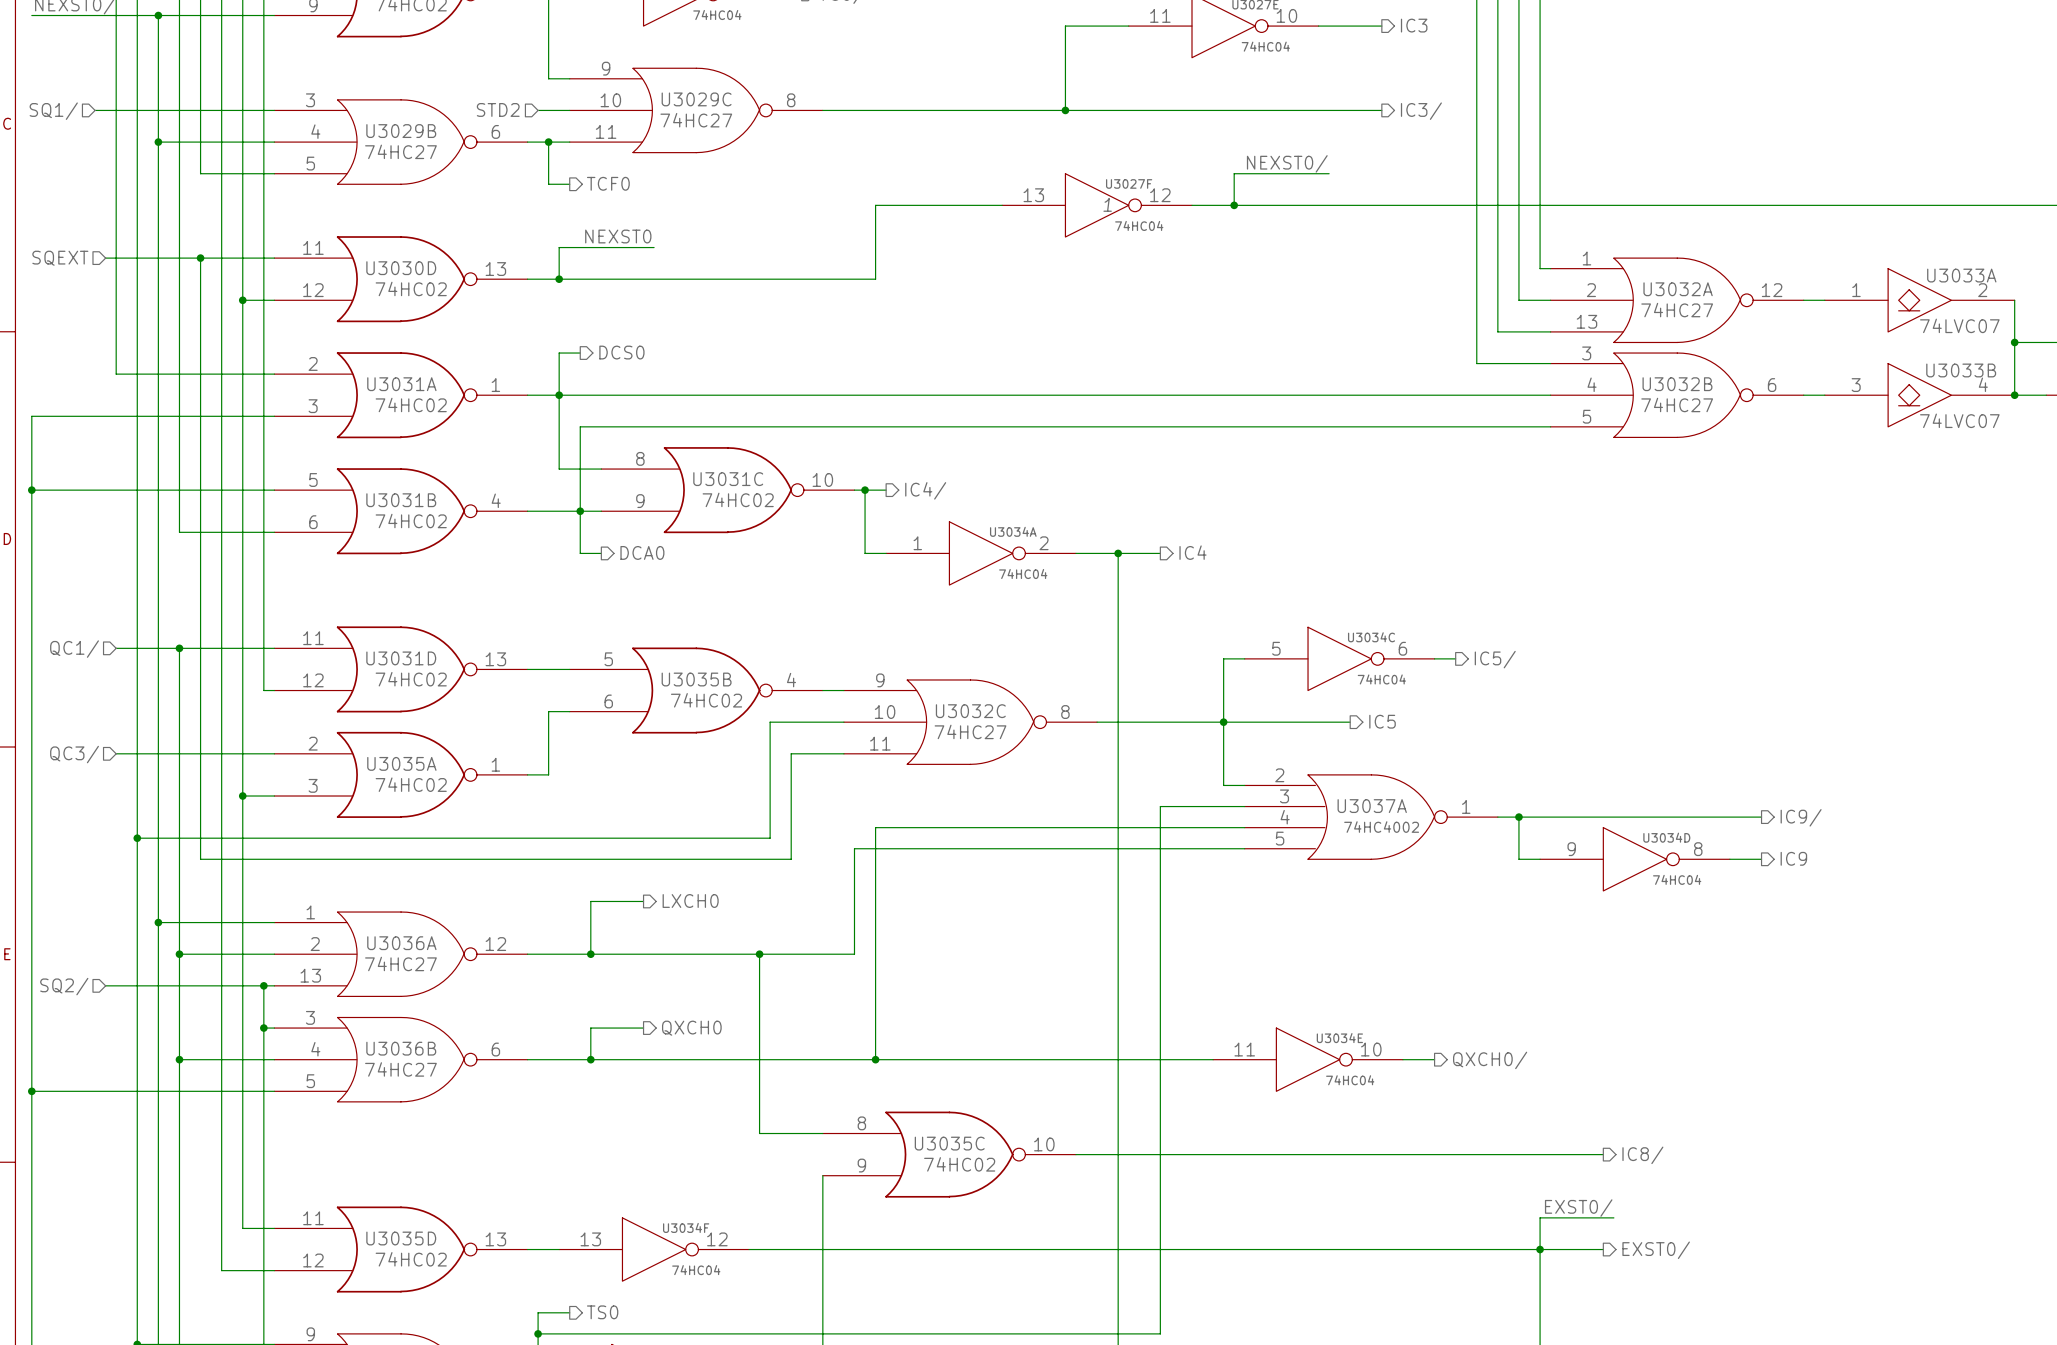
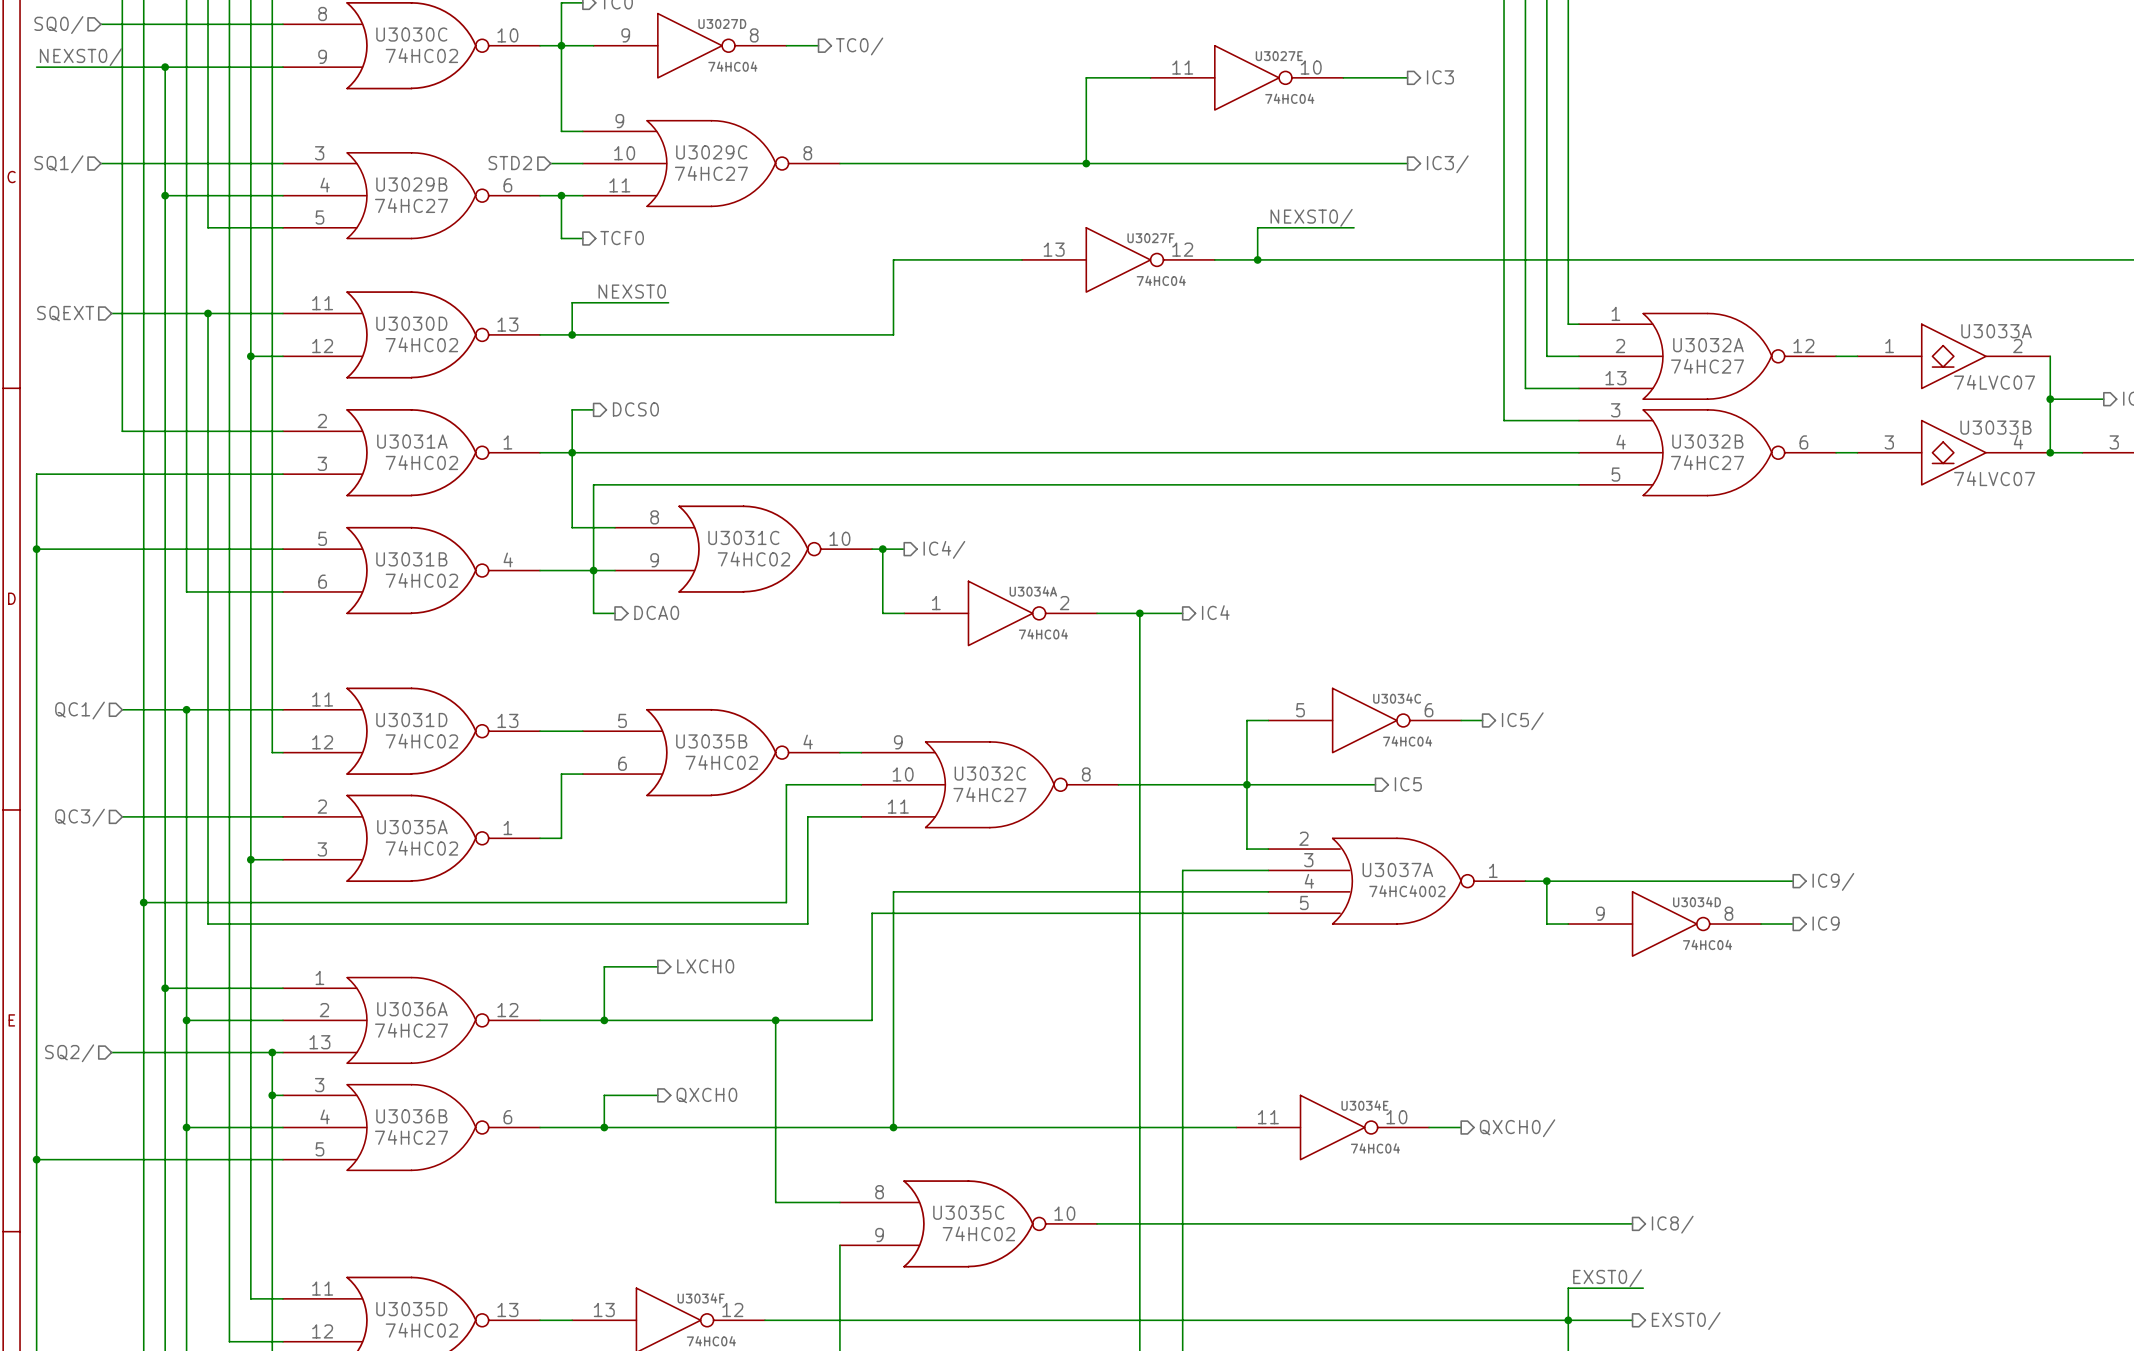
U3027F text: 1 (1107, 204) -> none

